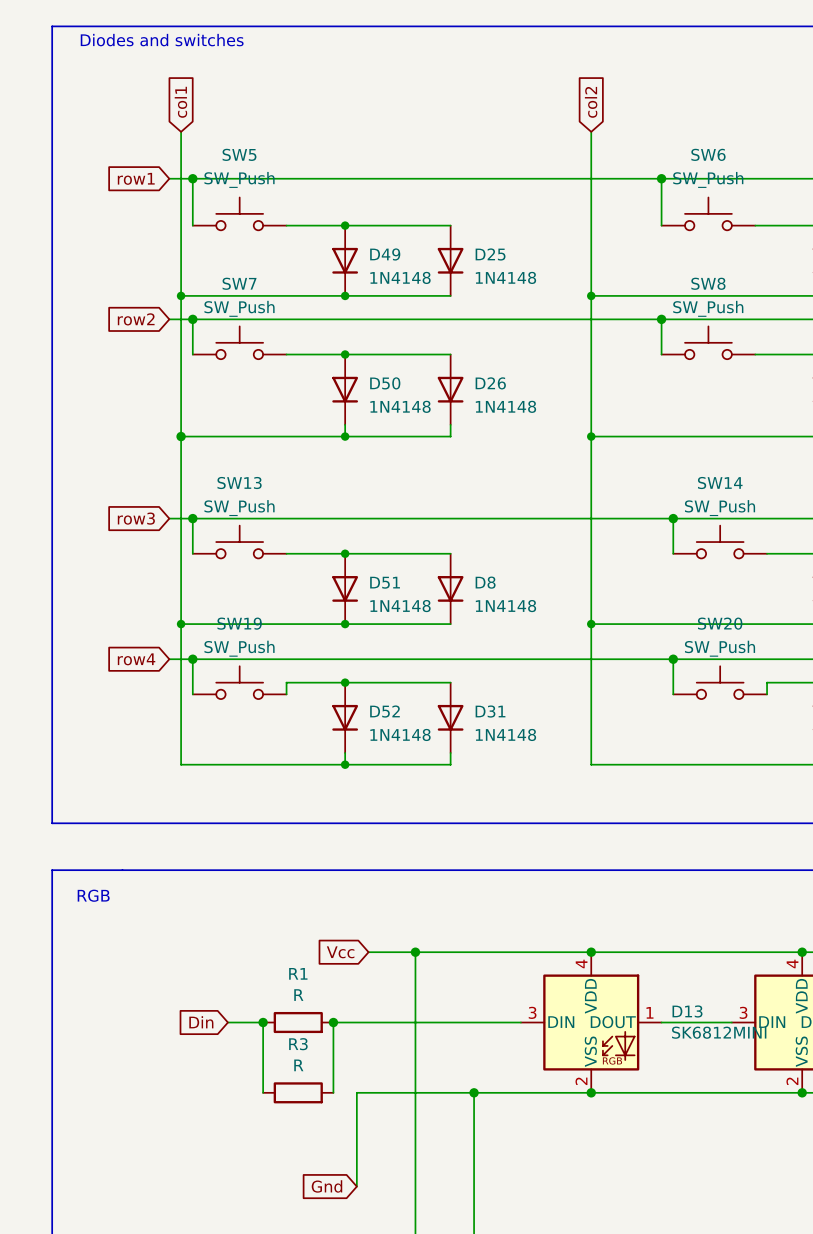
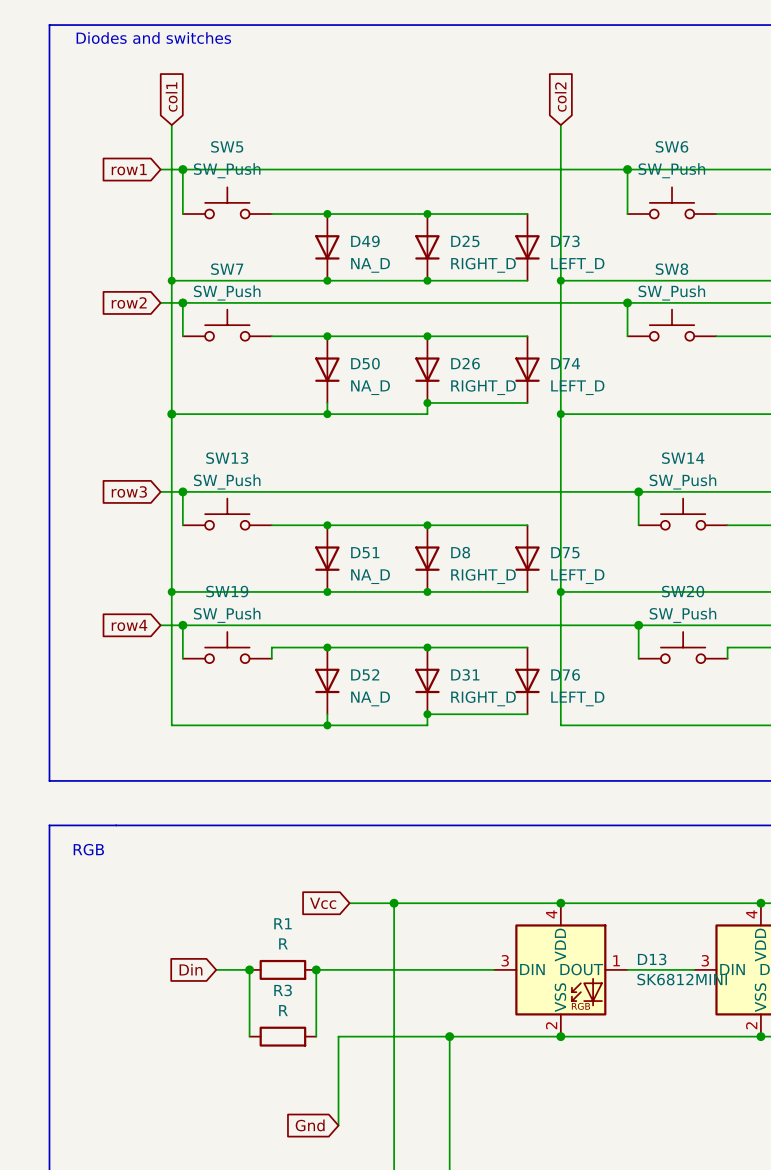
wire: none -> (427, 214) (527, 214)
junction: none -> (427, 214)
D73: none -> LEFT_D (527, 247)
D49 value: 1N4148 (400, 277) -> NA_D (370, 265)
D25 value: 1N4148 (505, 277) -> RIGHT_D (483, 265)
wire: none -> (427, 280) (527, 280)
junction: none -> (427, 280)
wire: none -> (427, 336) (527, 336)
junction: none -> (427, 336)
D74: none -> LEFT_D (527, 369)
D50 value: 1N4148 (400, 406) -> NA_D (370, 387)
D26 value: 1N4148 (505, 406) -> RIGHT_D (483, 387)
wire: none -> (427, 402) (527, 402)
junction: none -> (427, 402)
wire: none -> (427, 525) (527, 525)
junction: none -> (427, 525)
D75: none -> LEFT_D (527, 558)
D51 value: 1N4148 (400, 606) -> NA_D (370, 576)
D8 value: 1N4148 (505, 606) -> RIGHT_D (483, 576)
wire: none -> (427, 591) (527, 591)
junction: none -> (427, 591)
wire: none -> (427, 647) (527, 647)
junction: none -> (427, 647)
D76: none -> LEFT_D (527, 680)
D52 value: 1N4148 (400, 734) -> NA_D (370, 698)
D31 value: 1N4148 (505, 734) -> RIGHT_D (483, 698)
wire: none -> (427, 714) (527, 714)
junction: none -> (427, 714)

